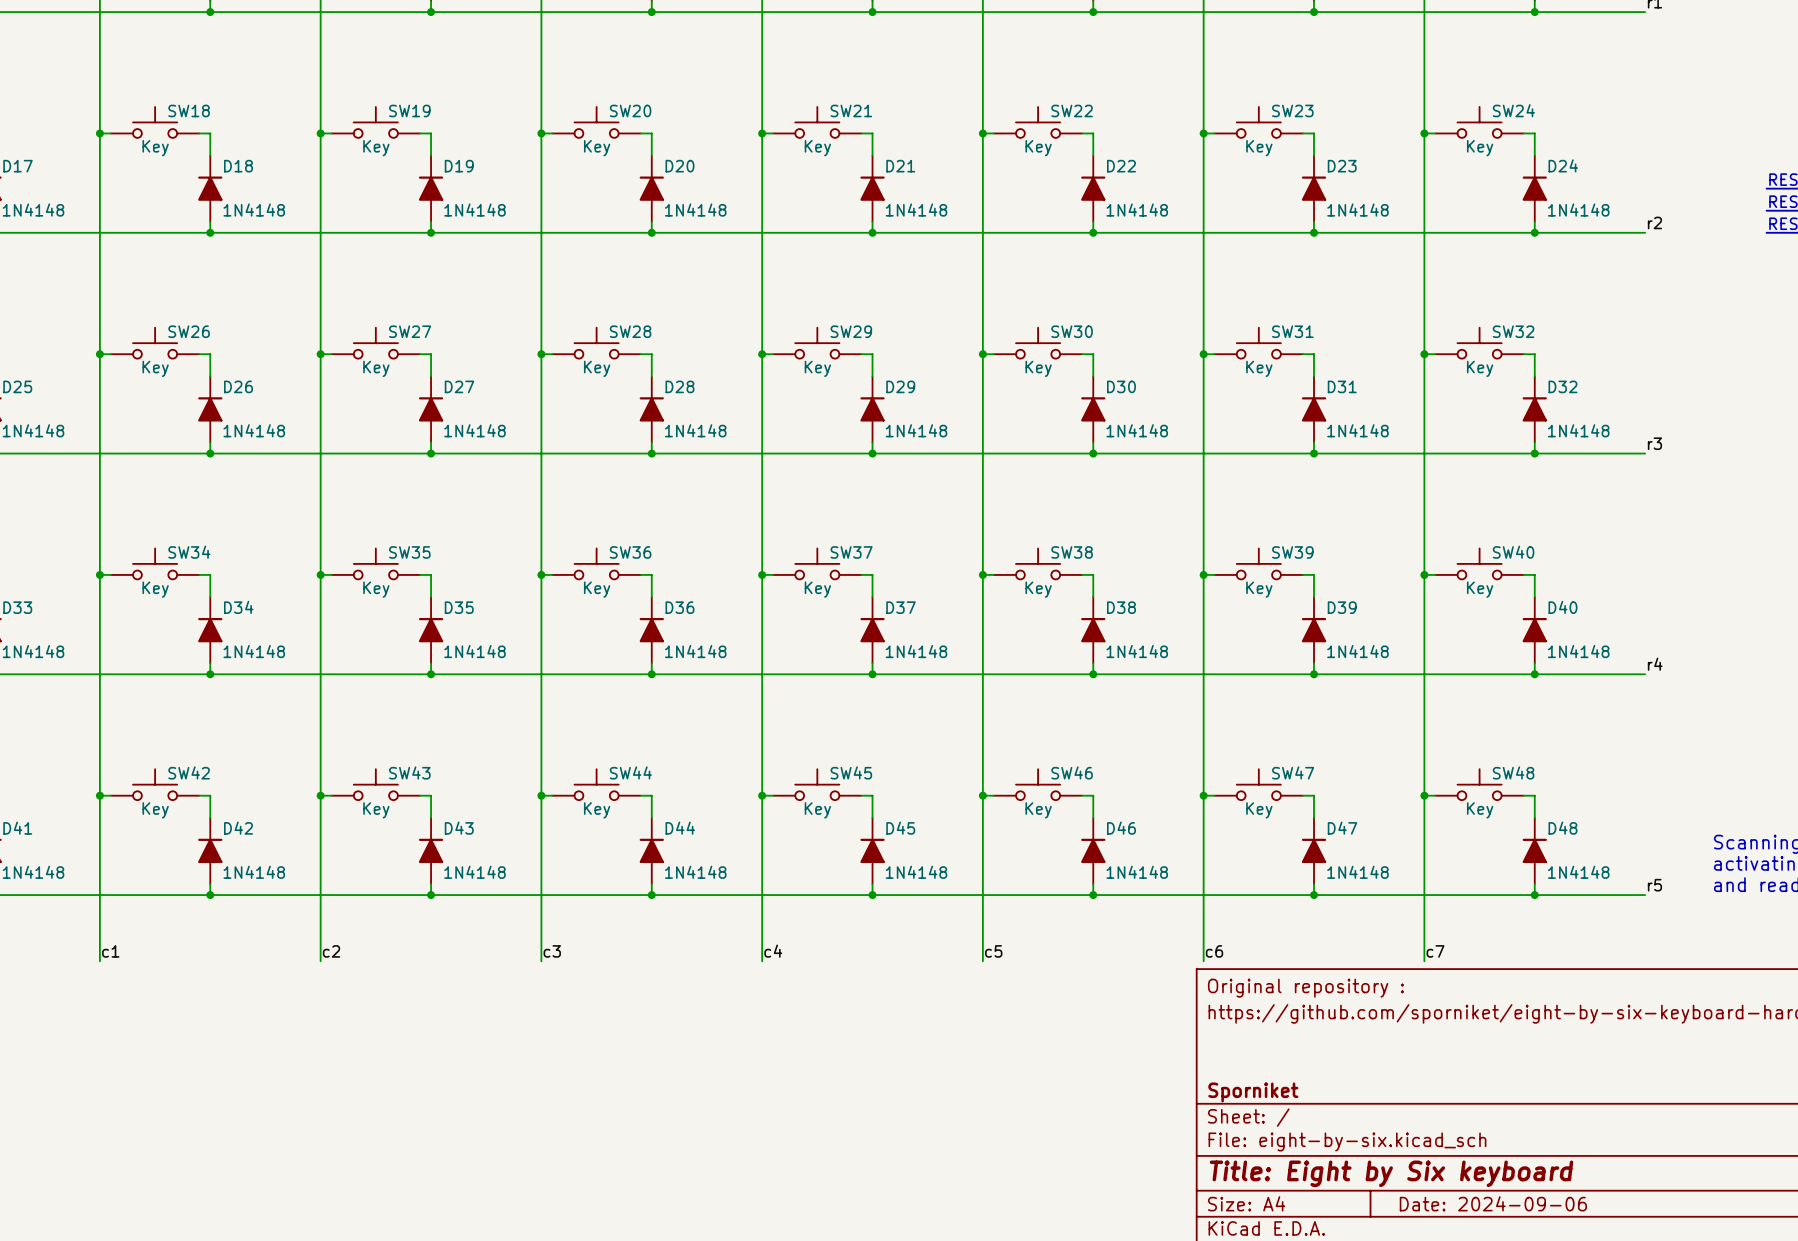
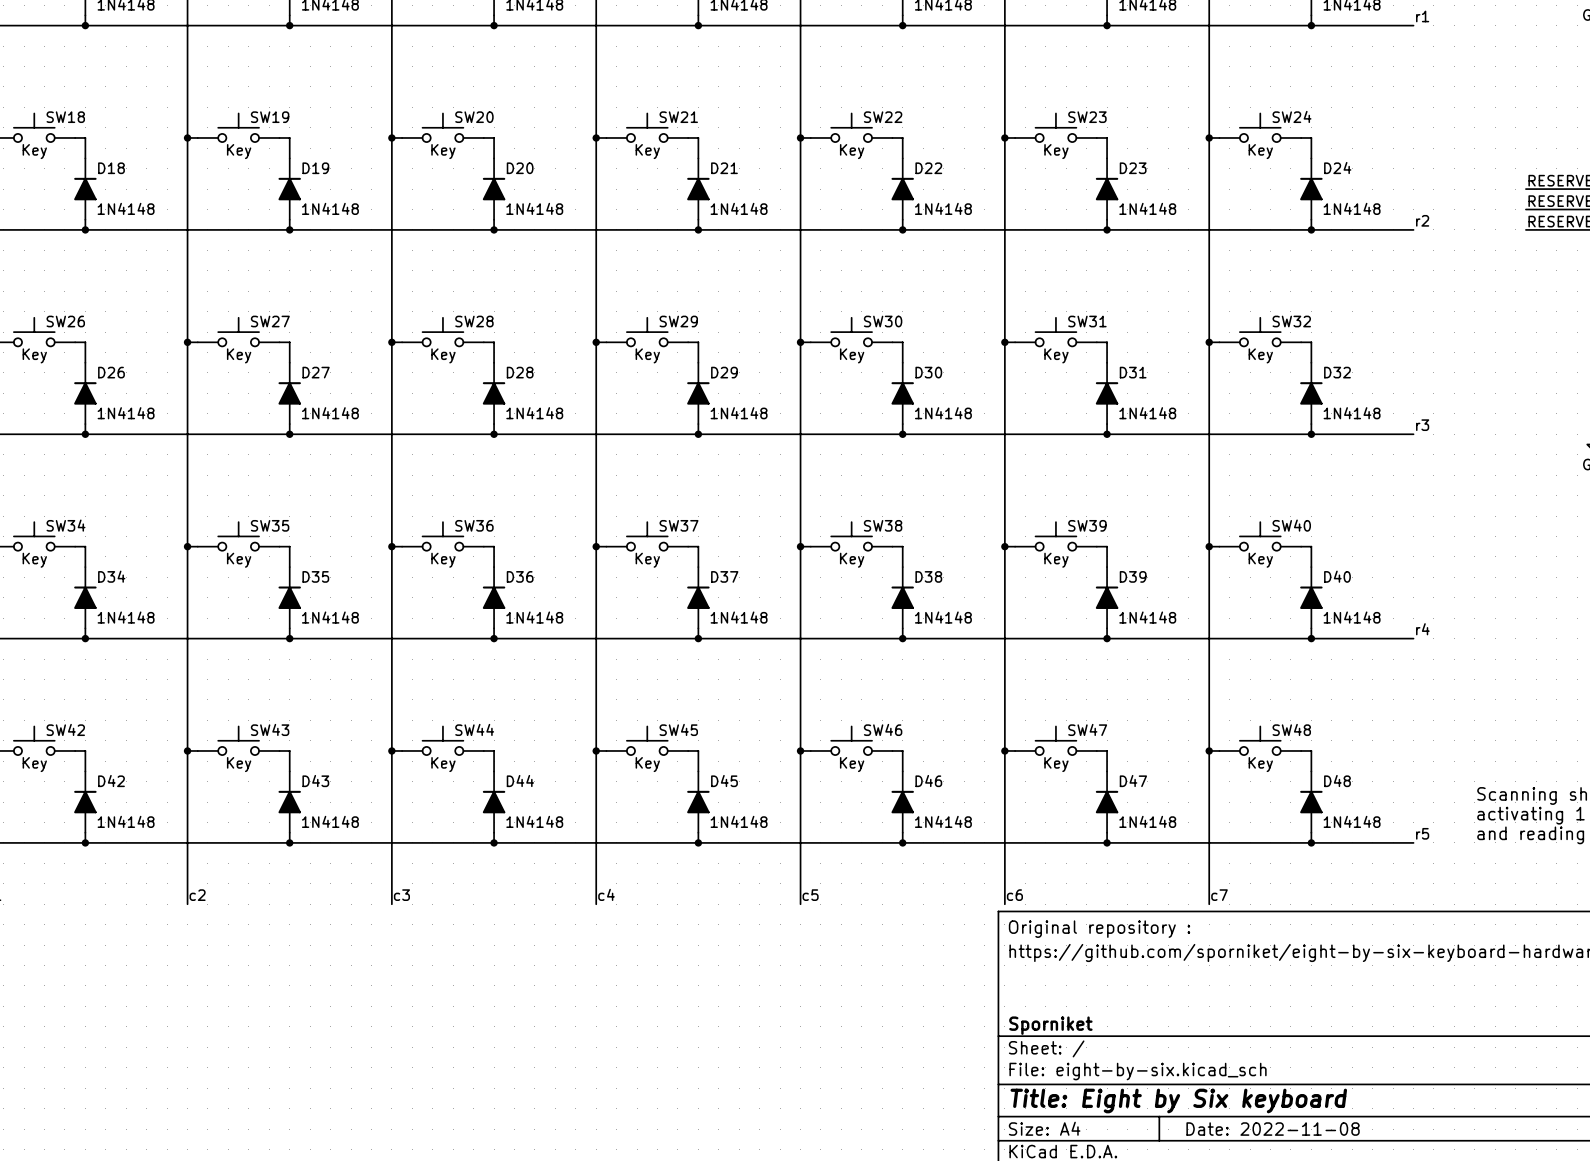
title block: Date: 2024-09-06 (1493, 1203) -> Date: 2022-11-08 (1273, 1129)

